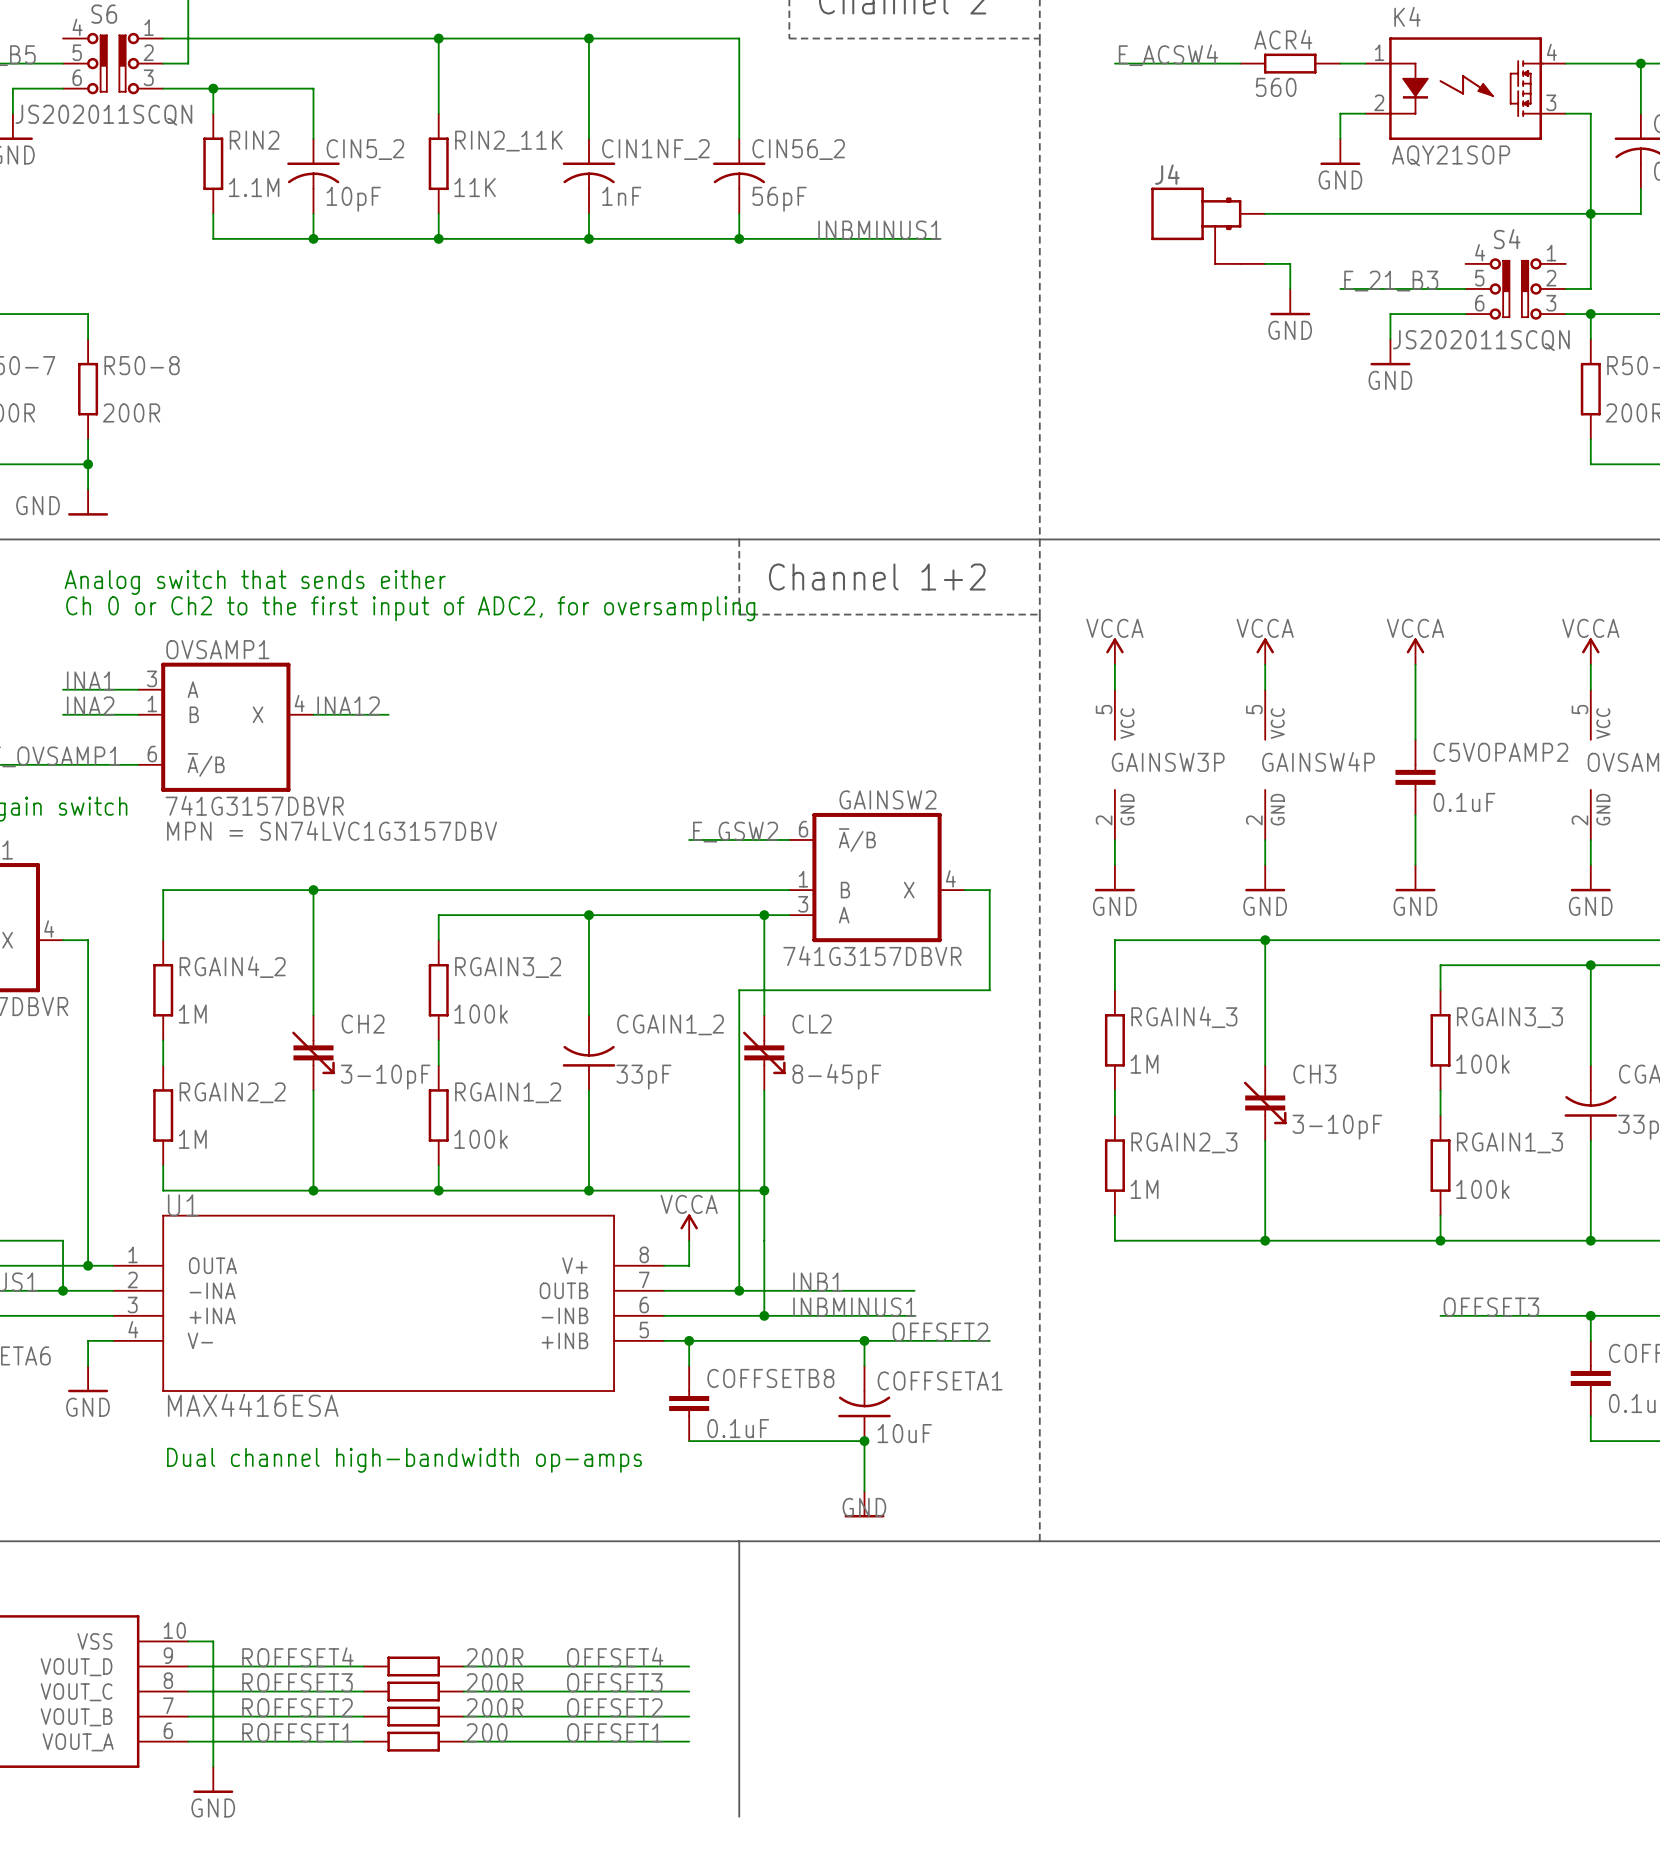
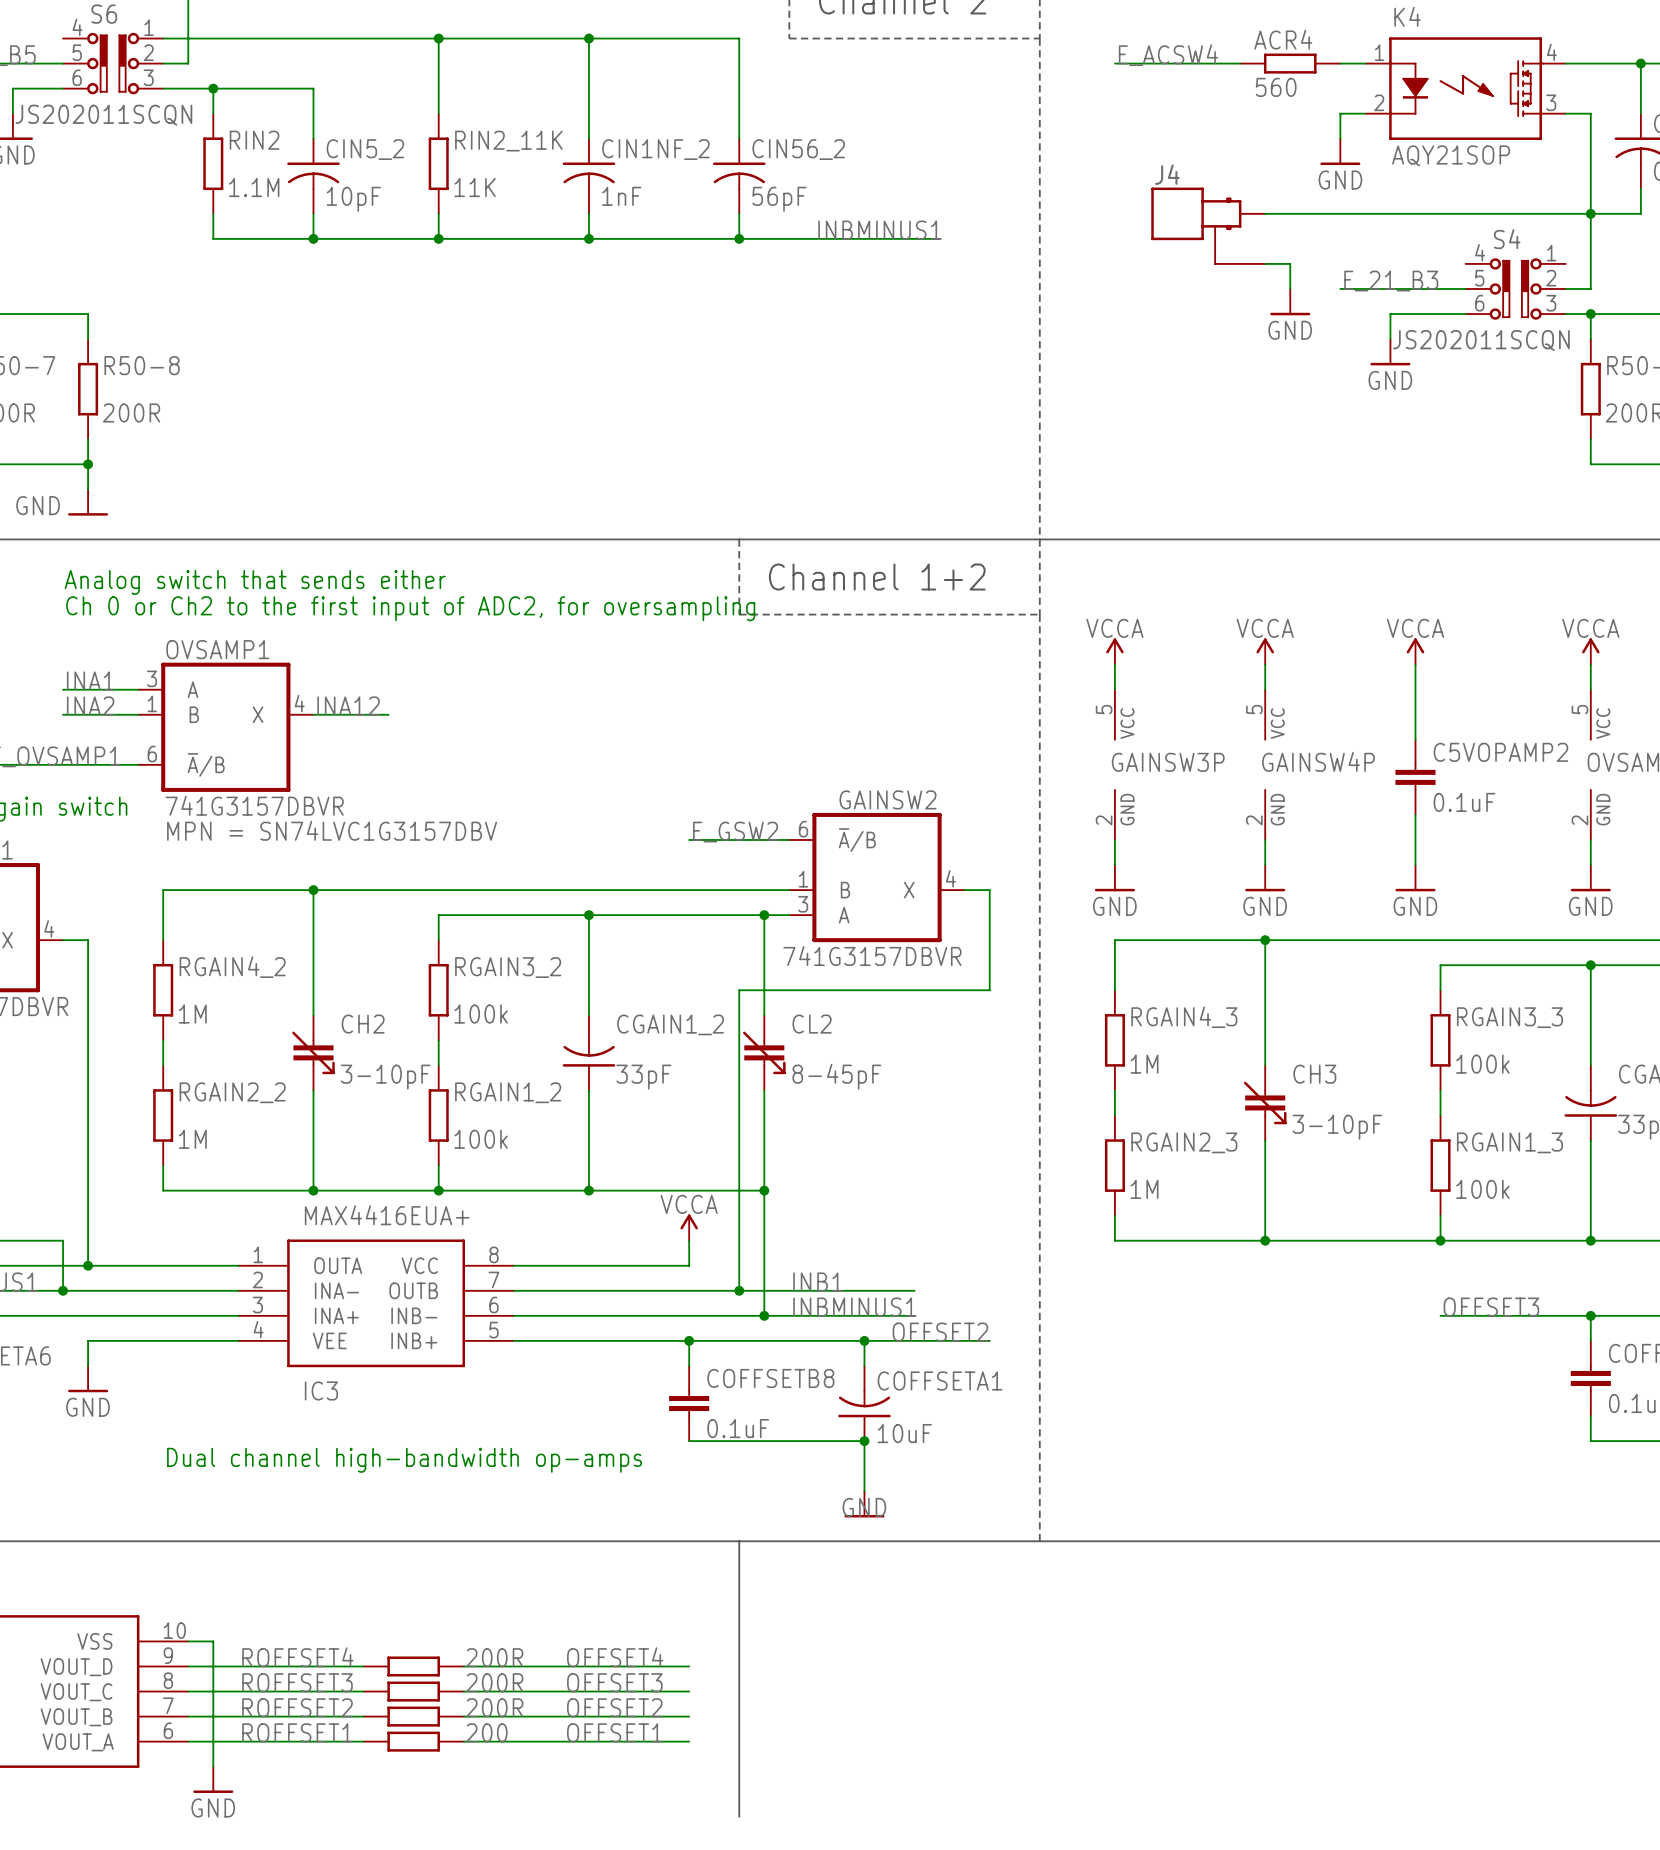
wire: none -> (113, 1265) (238, 1265)
wire: none -> (513, 1265) (664, 1265)
wire: none -> (113, 1290) (238, 1290)
wire: none -> (513, 1290) (664, 1290)
IC3: none -> MAX4416EUA+ (376, 1303)
U1: MAX4416ESA (388, 1303) -> none
wire: none -> (113, 1315) (238, 1315)
wire: none -> (513, 1315) (664, 1315)
wire: none -> (113, 1340) (238, 1340)
wire: none -> (513, 1340) (664, 1340)

